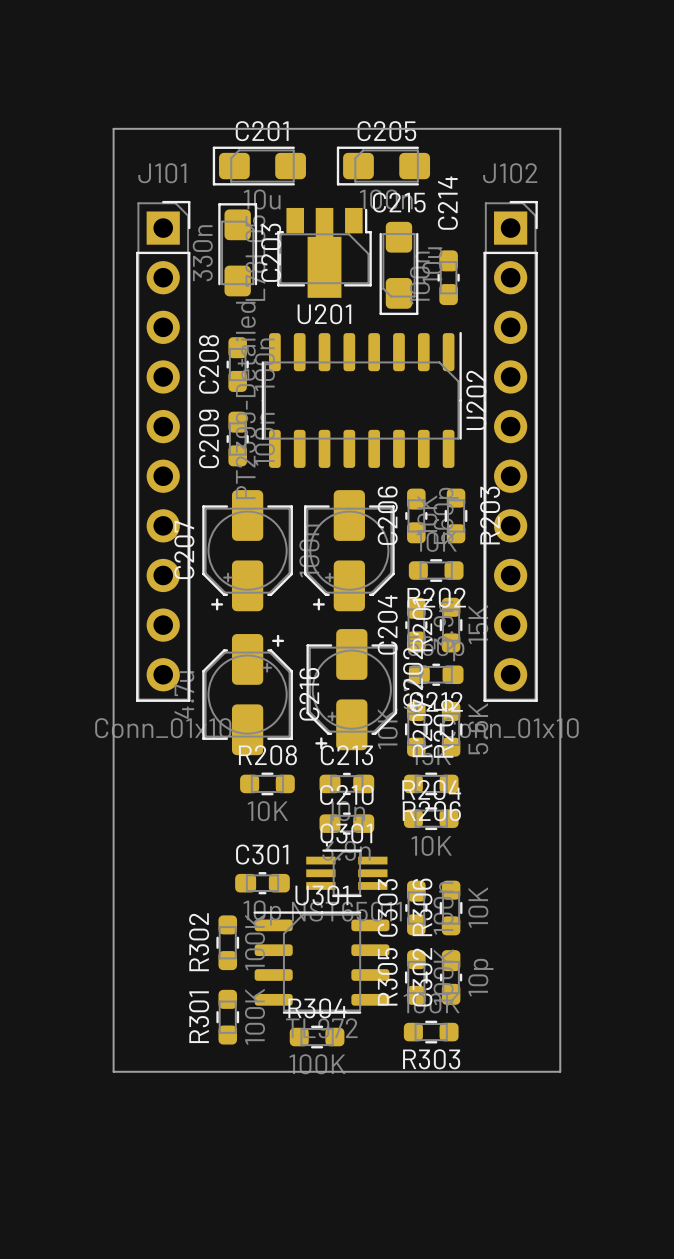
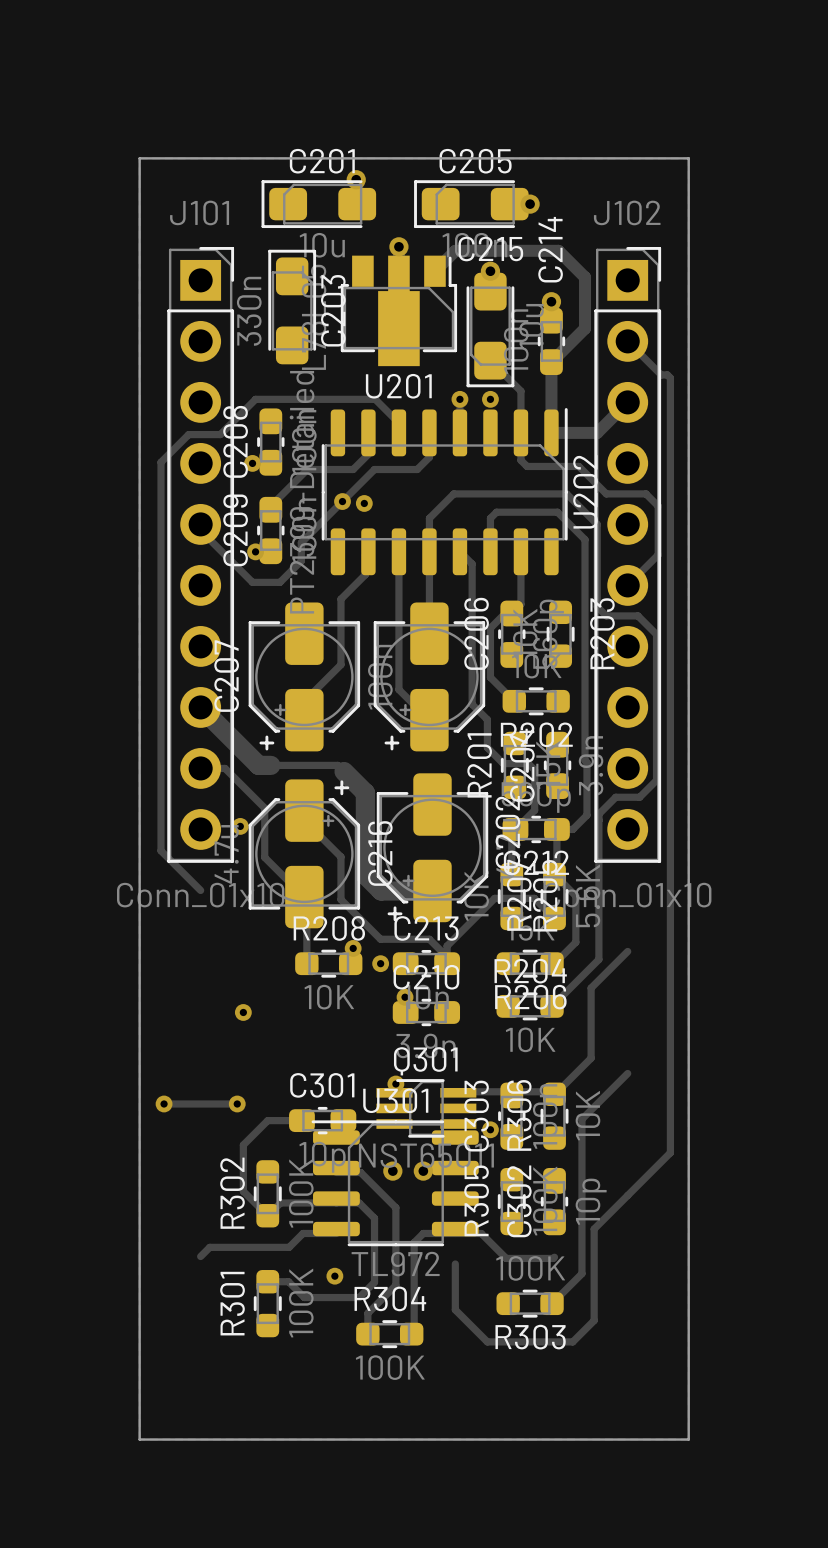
via: none -> (356, 179)
via: none -> (530, 204)
via: none -> (398, 246)
track: none -> (434, 271) (455, 250) (558, 250) (585, 277) (585, 328) (551, 362) (551, 432) (597, 432) (627, 402)
via: none -> (490, 271)
via: none -> (551, 301)
track: none -> (627, 341) (661, 374) (667, 374) (670, 377) (670, 1152) (594, 1229) (594, 1320) (572, 1341) (487, 1341) (455, 1309) (455, 1263)
track: none -> (490, 360) (520, 391) (520, 460) (527, 466) (578, 466) (606, 493) (646, 493) (658, 506) (658, 554) (627, 585)
via: none -> (459, 399)
via: none -> (490, 399)
track: none -> (368, 432) (368, 454) (353, 469) (307, 469) (270, 506) (270, 509)
track: none -> (398, 432) (398, 423) (375, 399) (255, 399) (220, 434) (188, 434) (161, 462) (161, 850) (200, 890)
track: none -> (429, 432) (429, 457) (417, 469) (374, 469) (301, 542) (301, 561) (279, 582) (252, 582) (200, 530) (200, 524)
C208 position: (237, 364) -> (270, 442)
via: none -> (252, 463)
via: none -> (342, 501)
via: none -> (364, 503)
C209 position: (237, 439) -> (270, 530)
via: none -> (255, 551)
track: none -> (368, 551) (365, 554) (365, 574) (340, 599) (340, 664) (304, 701) (304, 720)
track: none -> (398, 551) (398, 689) (429, 720)
track: none -> (459, 551) (472, 564) (472, 704) (487, 719) (487, 747) (503, 763) (528, 763) (534, 769) (534, 810) (511, 833) (511, 874)
track: none -> (490, 551) (490, 518) (496, 512) (557, 512) (585, 539) (585, 760) (586, 762) (586, 815) (572, 829) (556, 829) (556, 872) (554, 874) (575, 896) (575, 942) (554, 963) (552, 963)
track: none -> (520, 551) (520, 604) (511, 613) (505, 613) (490, 628) (490, 677) (514, 701)
track: none -> (429, 633) (429, 518) (453, 493) (566, 493) (597, 524) (597, 606) (606, 615) (637, 615) (656, 634) (656, 780) (639, 797) (615, 797) (598, 814) (598, 959) (552, 1006)
track: none -> (200, 707) (258, 765) (337, 765) (365, 792) (365, 875) (381, 890) (432, 890)
track: none -> (200, 768) (225, 768) (264, 808) (264, 857) (306, 899) (306, 963)
C204 position: (416, 625) -> (557, 765)
R201 position: (451, 625) -> (514, 765)
track: none -> (304, 810) (304, 820) (340, 856) (340, 899) (380, 939) (429, 939) (447, 956)
via: none -> (240, 826)
track: none -> (554, 918) (534, 898) (494, 898) (447, 946) (447, 963)
via: none -> (353, 948)
track: none -> (627, 951) (591, 988) (591, 1058) (557, 1091) (458, 1092)
via: none -> (380, 963)
via: none -> (405, 997)
via: none -> (243, 1012)
Q301 position: (346, 873) -> (426, 1108)
track: none -> (627, 1073) (581, 1119) (581, 1273) (552, 1303)
via: none -> (395, 1084)
C301 position: (262, 883) -> (322, 1120)
track: none -> (164, 1103) (237, 1103)
via: none -> (164, 1103)
via: none -> (237, 1103)
track: none -> (301, 1120) (267, 1120) (243, 1145) (243, 1191) (267, 1215) (280, 1202) (359, 1202) (374, 1218) (374, 1282) (359, 1297) (304, 1297) (288, 1281) (267, 1281)
via: none -> (490, 1129)
R302 position: (227, 942) -> (267, 1193)
via: none -> (392, 1171)
via: none -> (423, 1171)
track: none -> (336, 1172) (360, 1172) (395, 1207) (395, 1285) (367, 1313) (367, 1334)
track: none -> (336, 1233) (303, 1233) (289, 1247) (209, 1247) (200, 1256)
R301 position: (227, 1017) -> (267, 1303)
track: none -> (554, 1257) (506, 1258) (481, 1233) (423, 1233) (414, 1242) (414, 1331) (411, 1334)
R303 position: (431, 1032) -> (530, 1303)
R304 position: (317, 1037) -> (389, 1334)
via: none -> (334, 1276)
board edge: (113, 1071) (560, 1071) -> (139, 1317) (139, 1439) (688, 1439) (688, 1317)

